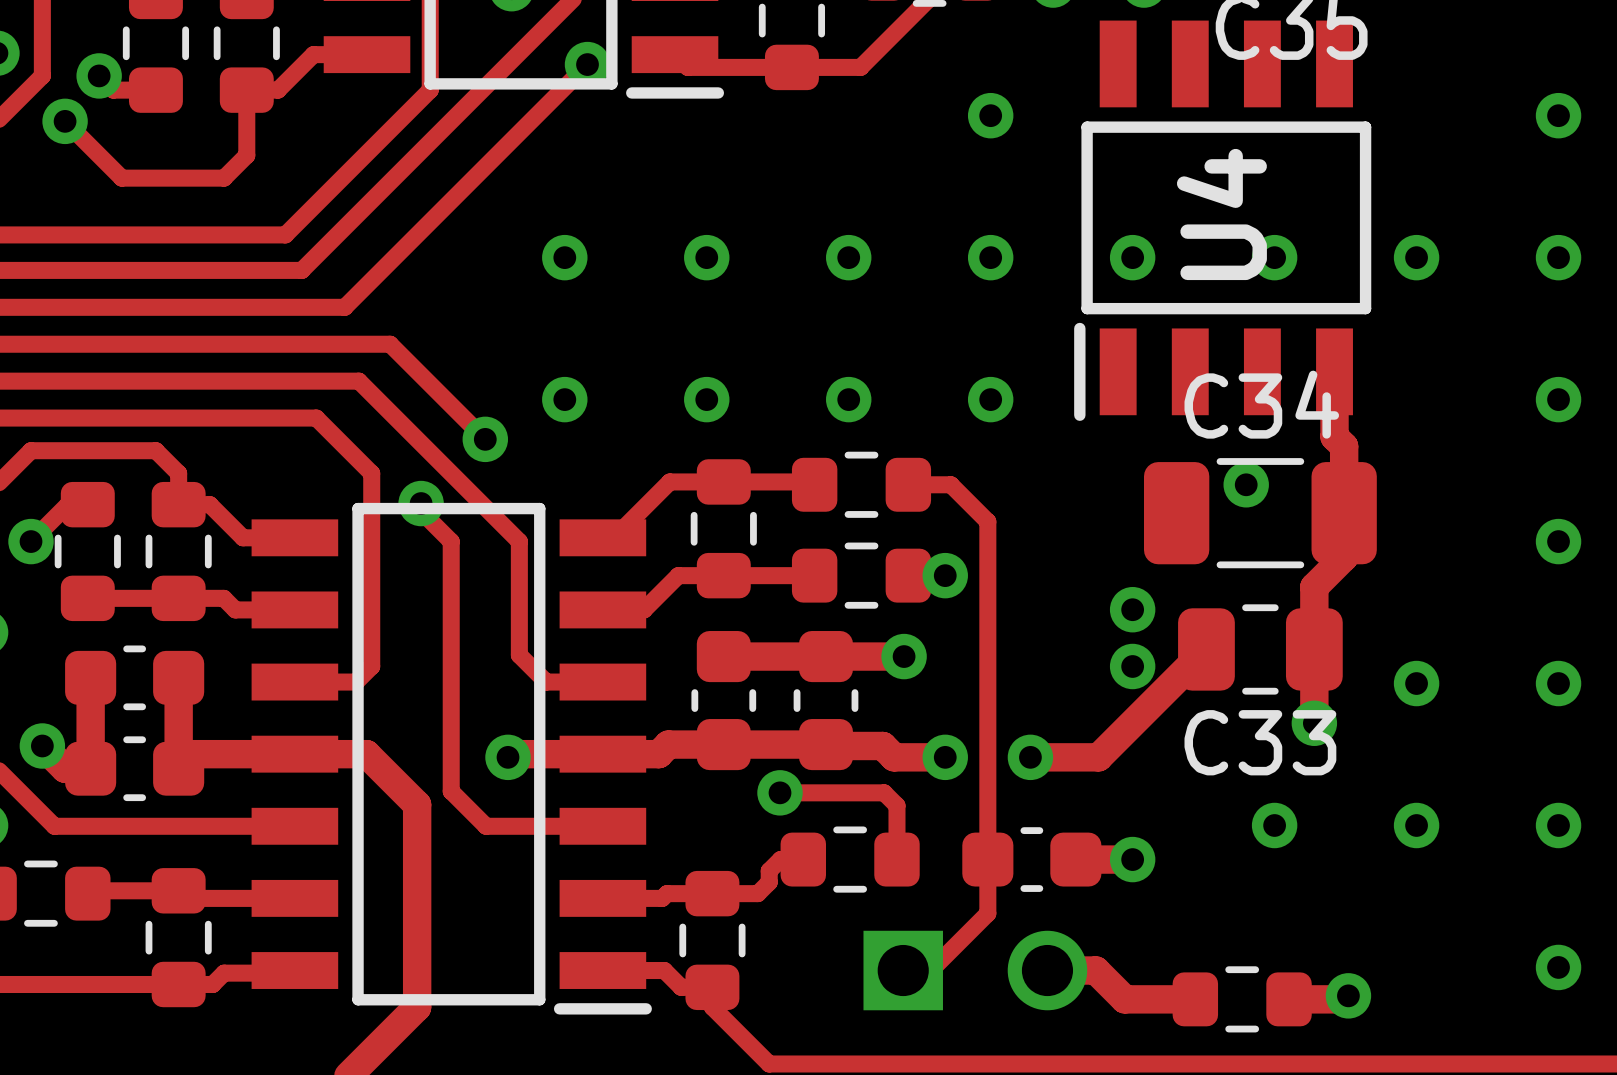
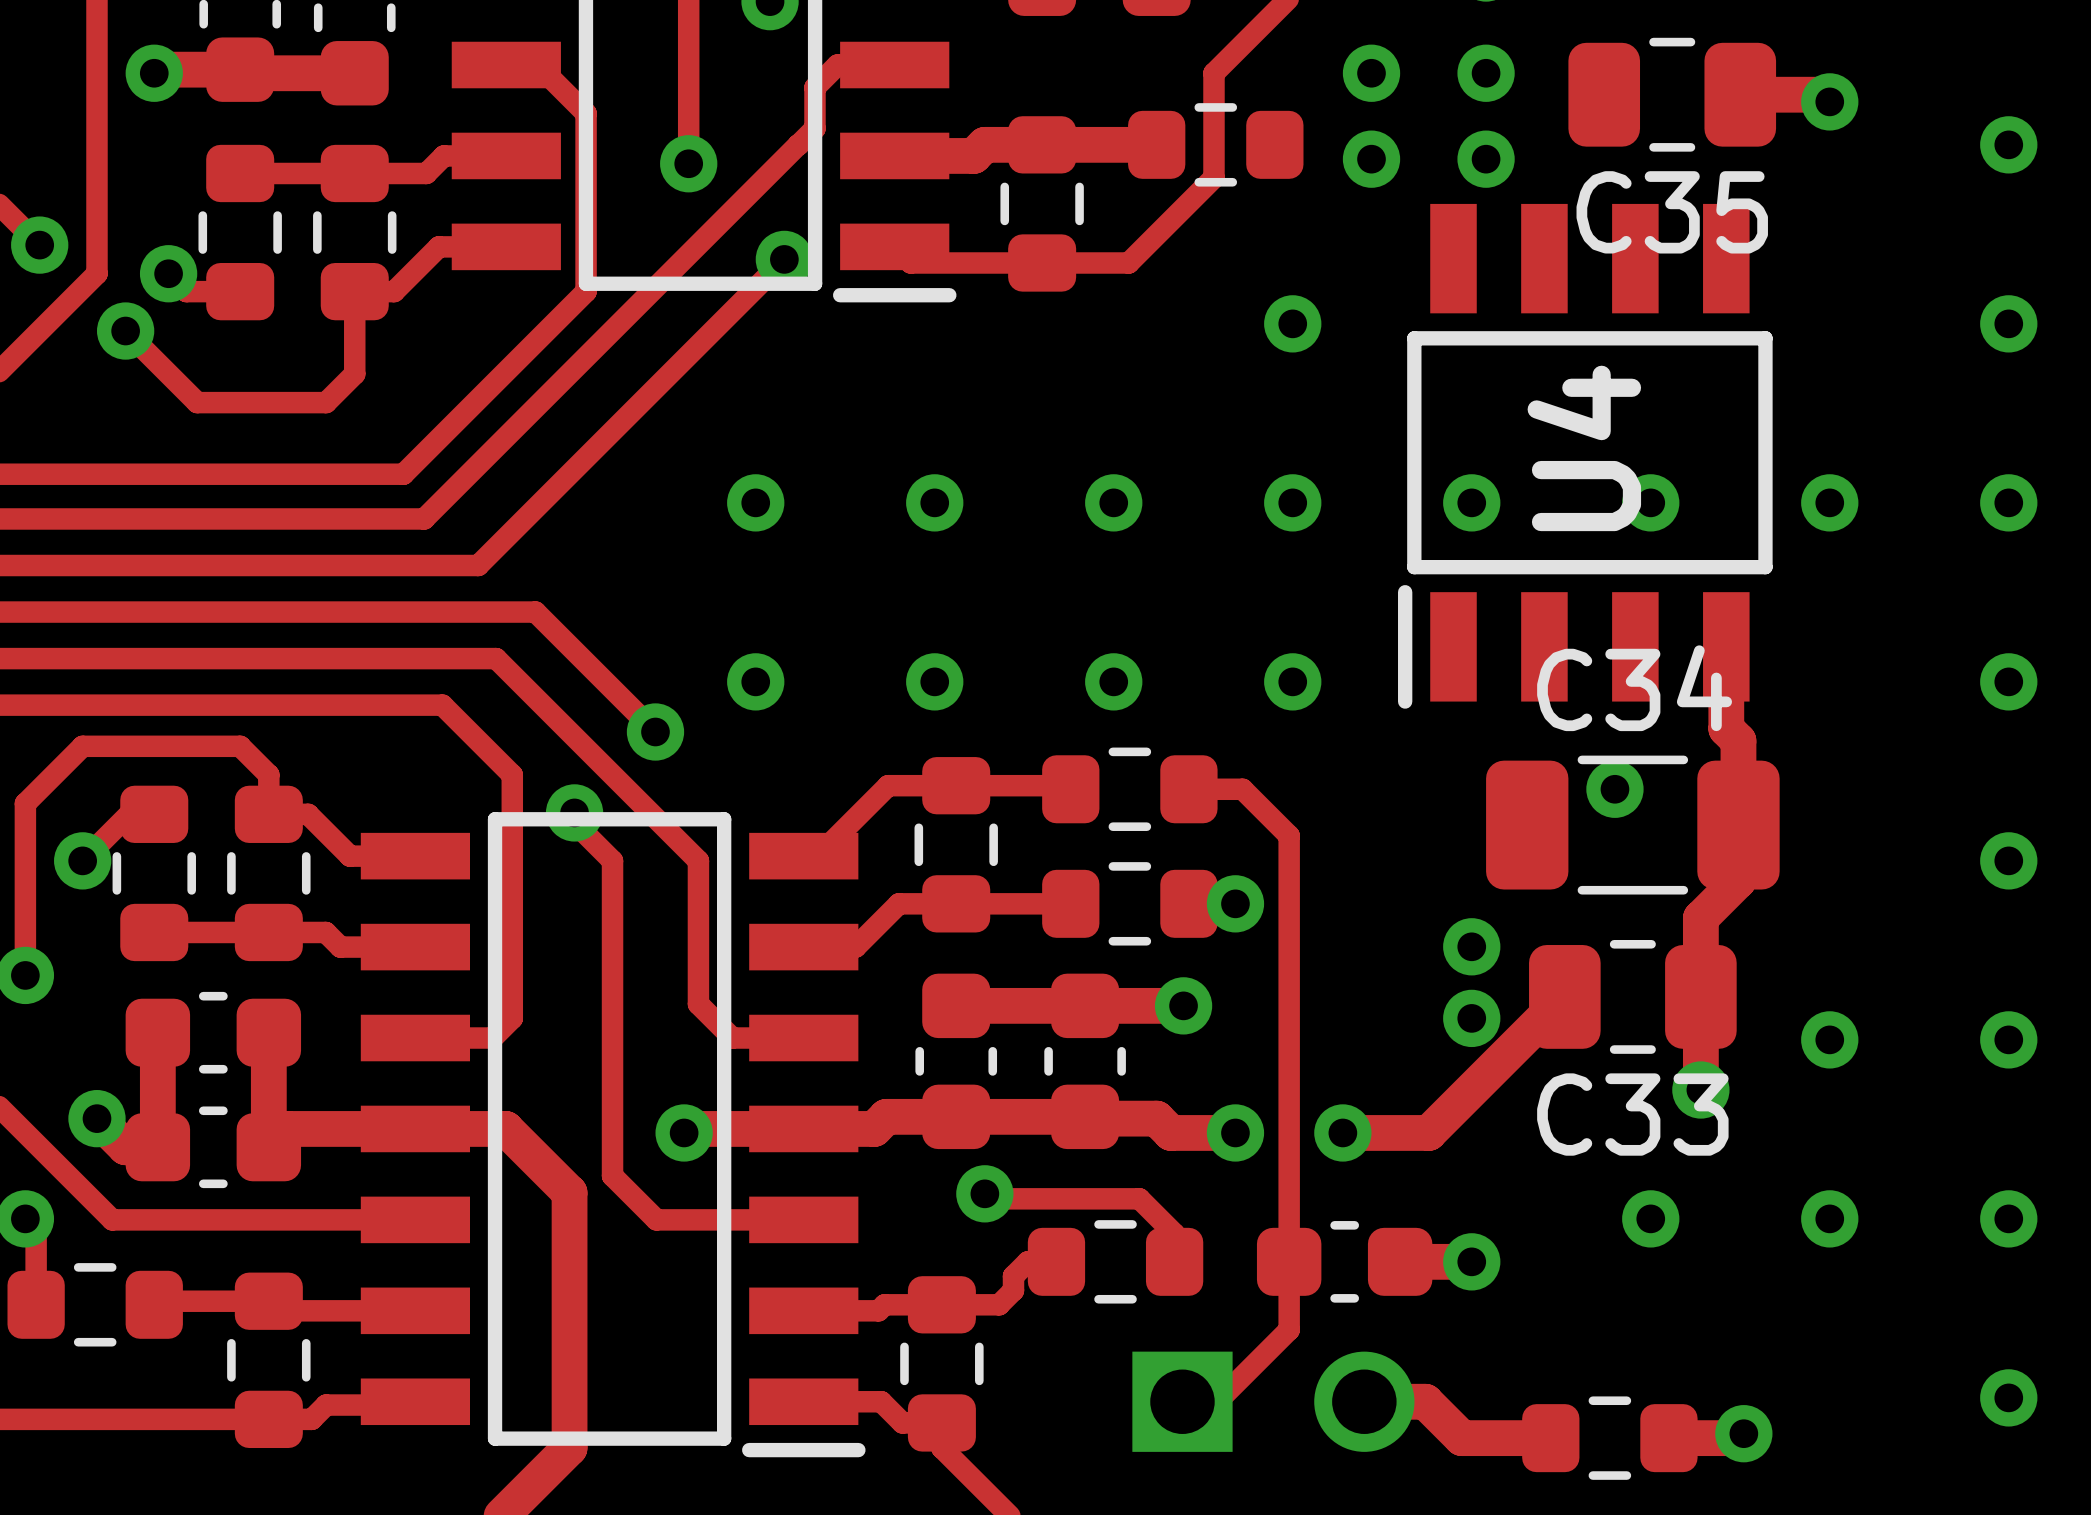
track: (780, 792) (884, 792) (896, 805) (896, 837) -> (984, 1193) (989, 1198) (1139, 1198) (1174, 1233)
via position: (780, 792) -> (984, 1193)

